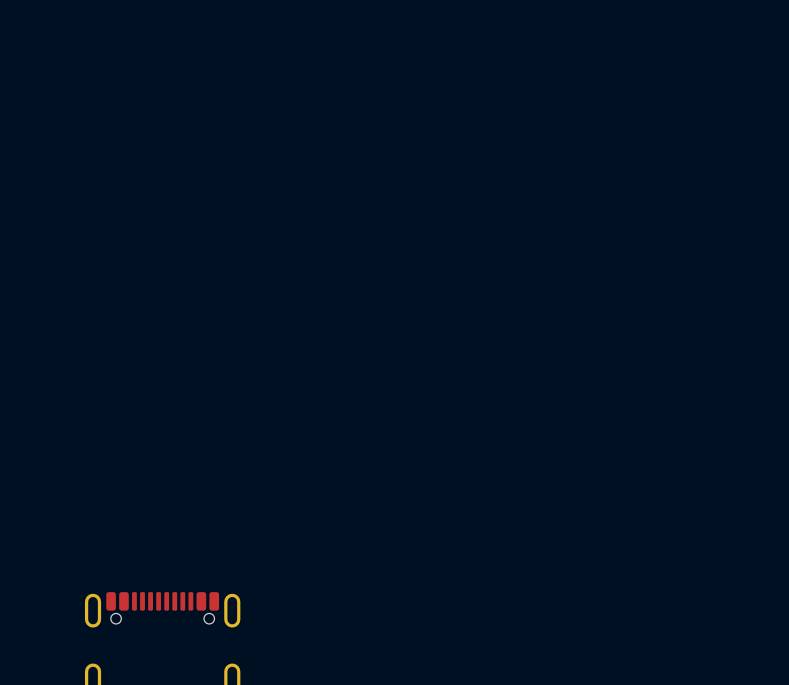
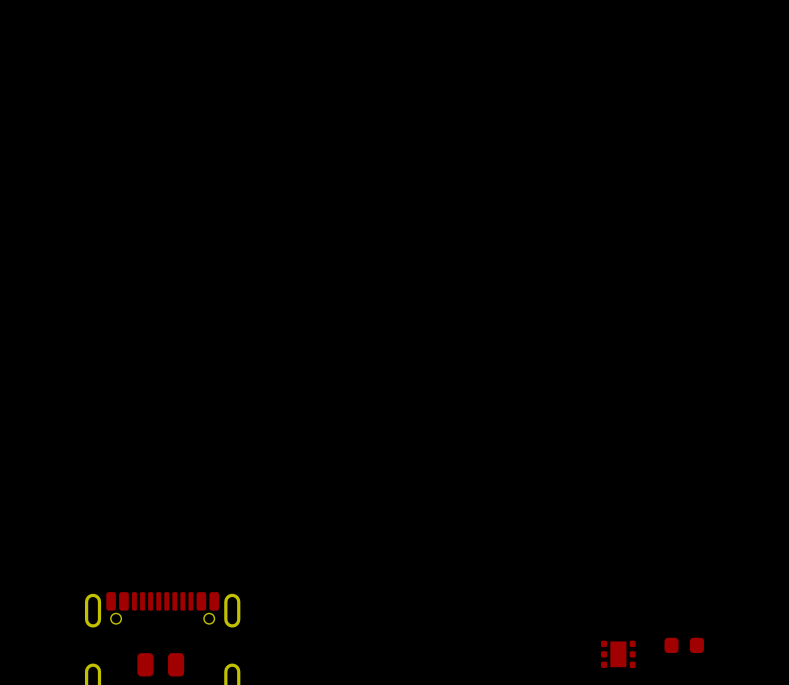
part: none -> (684, 645)
part: none -> (618, 654)
part: none -> (160, 664)

